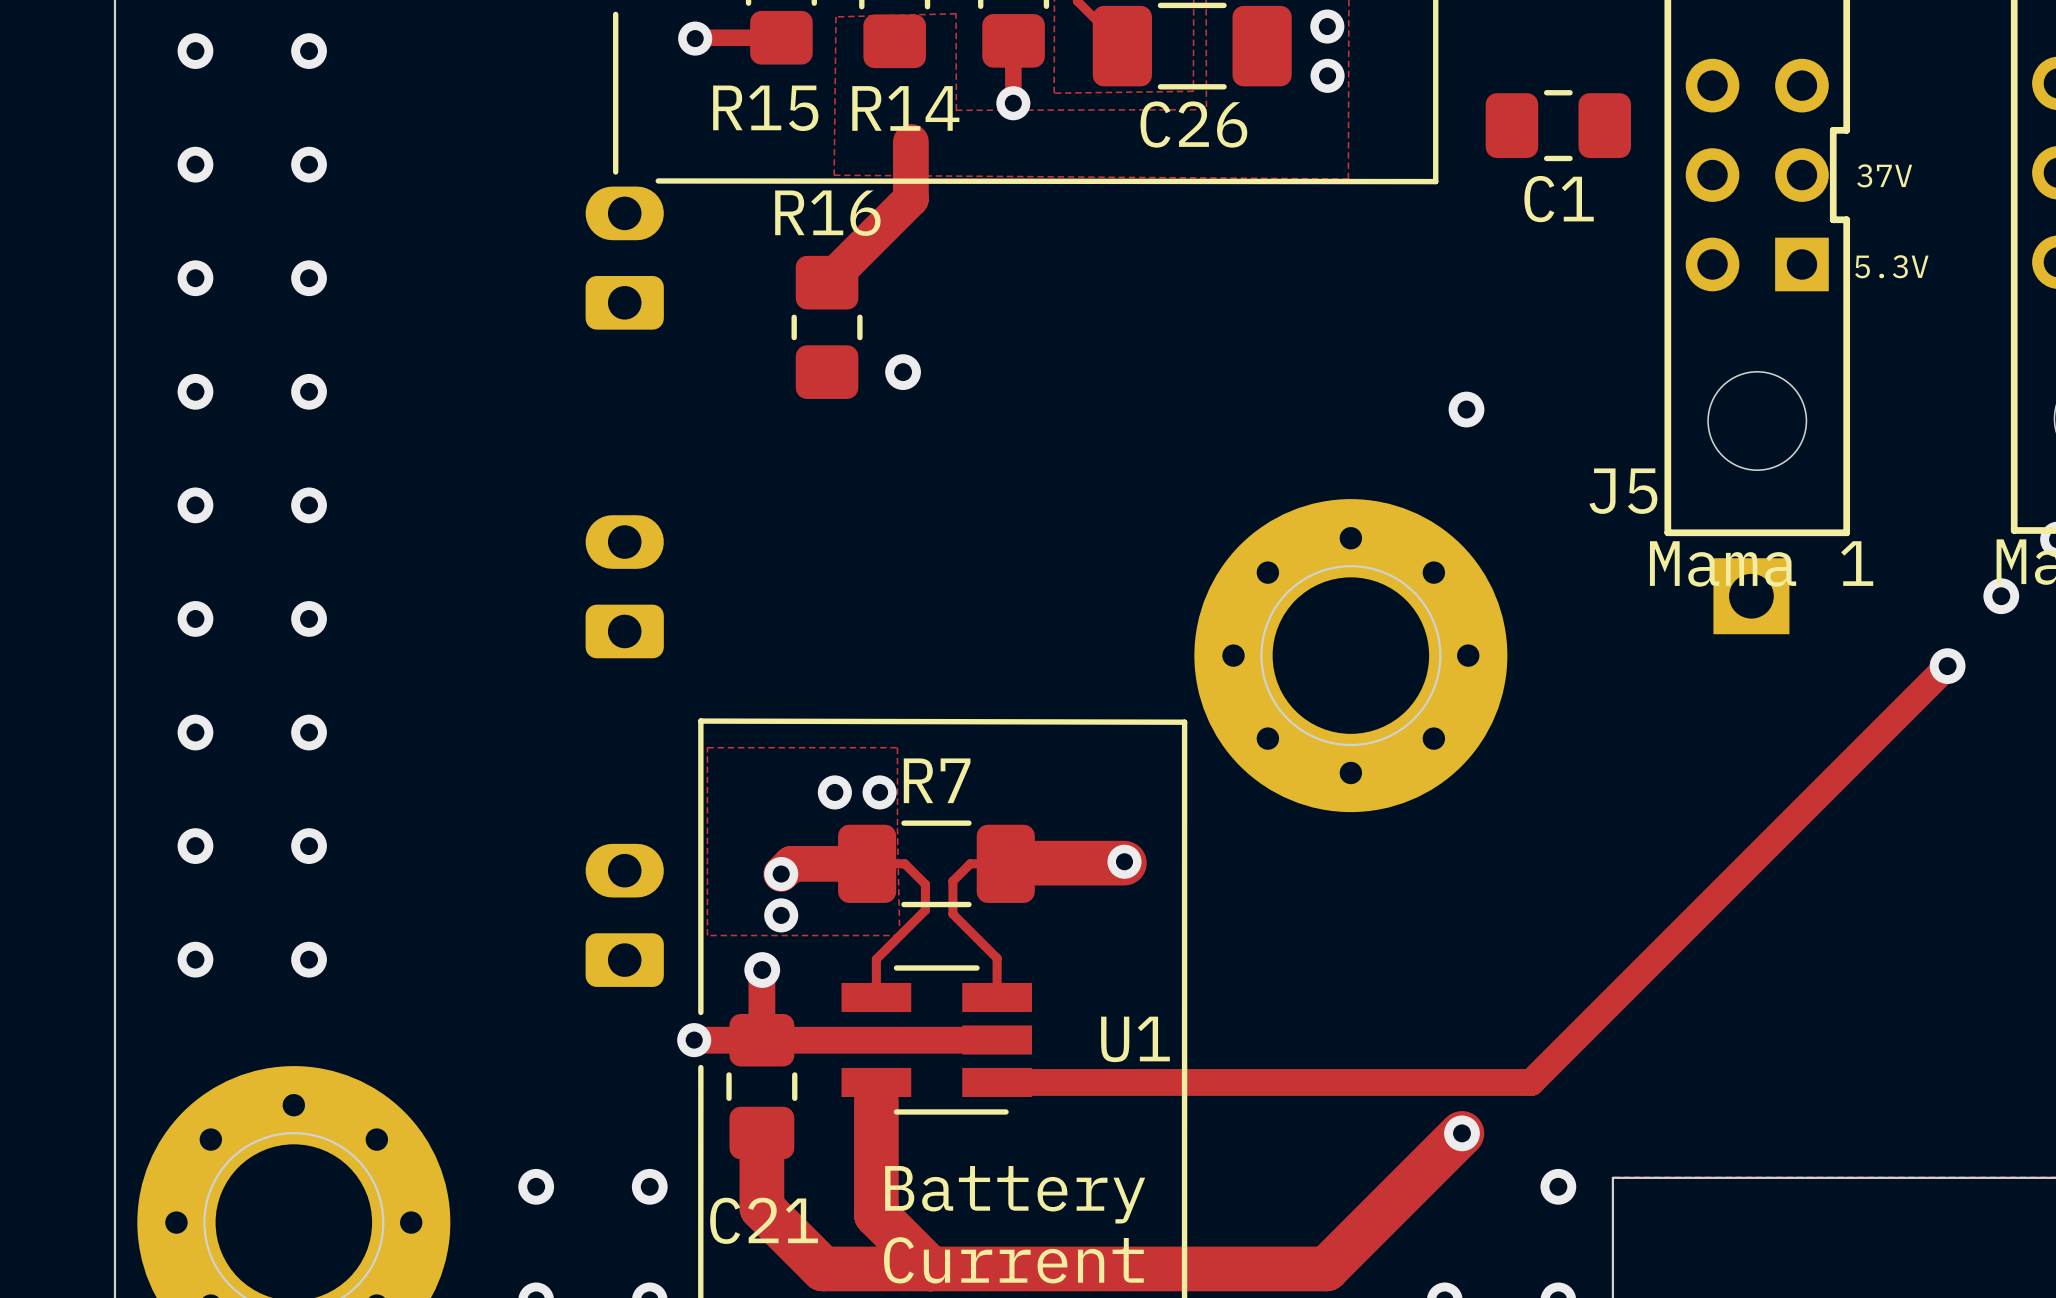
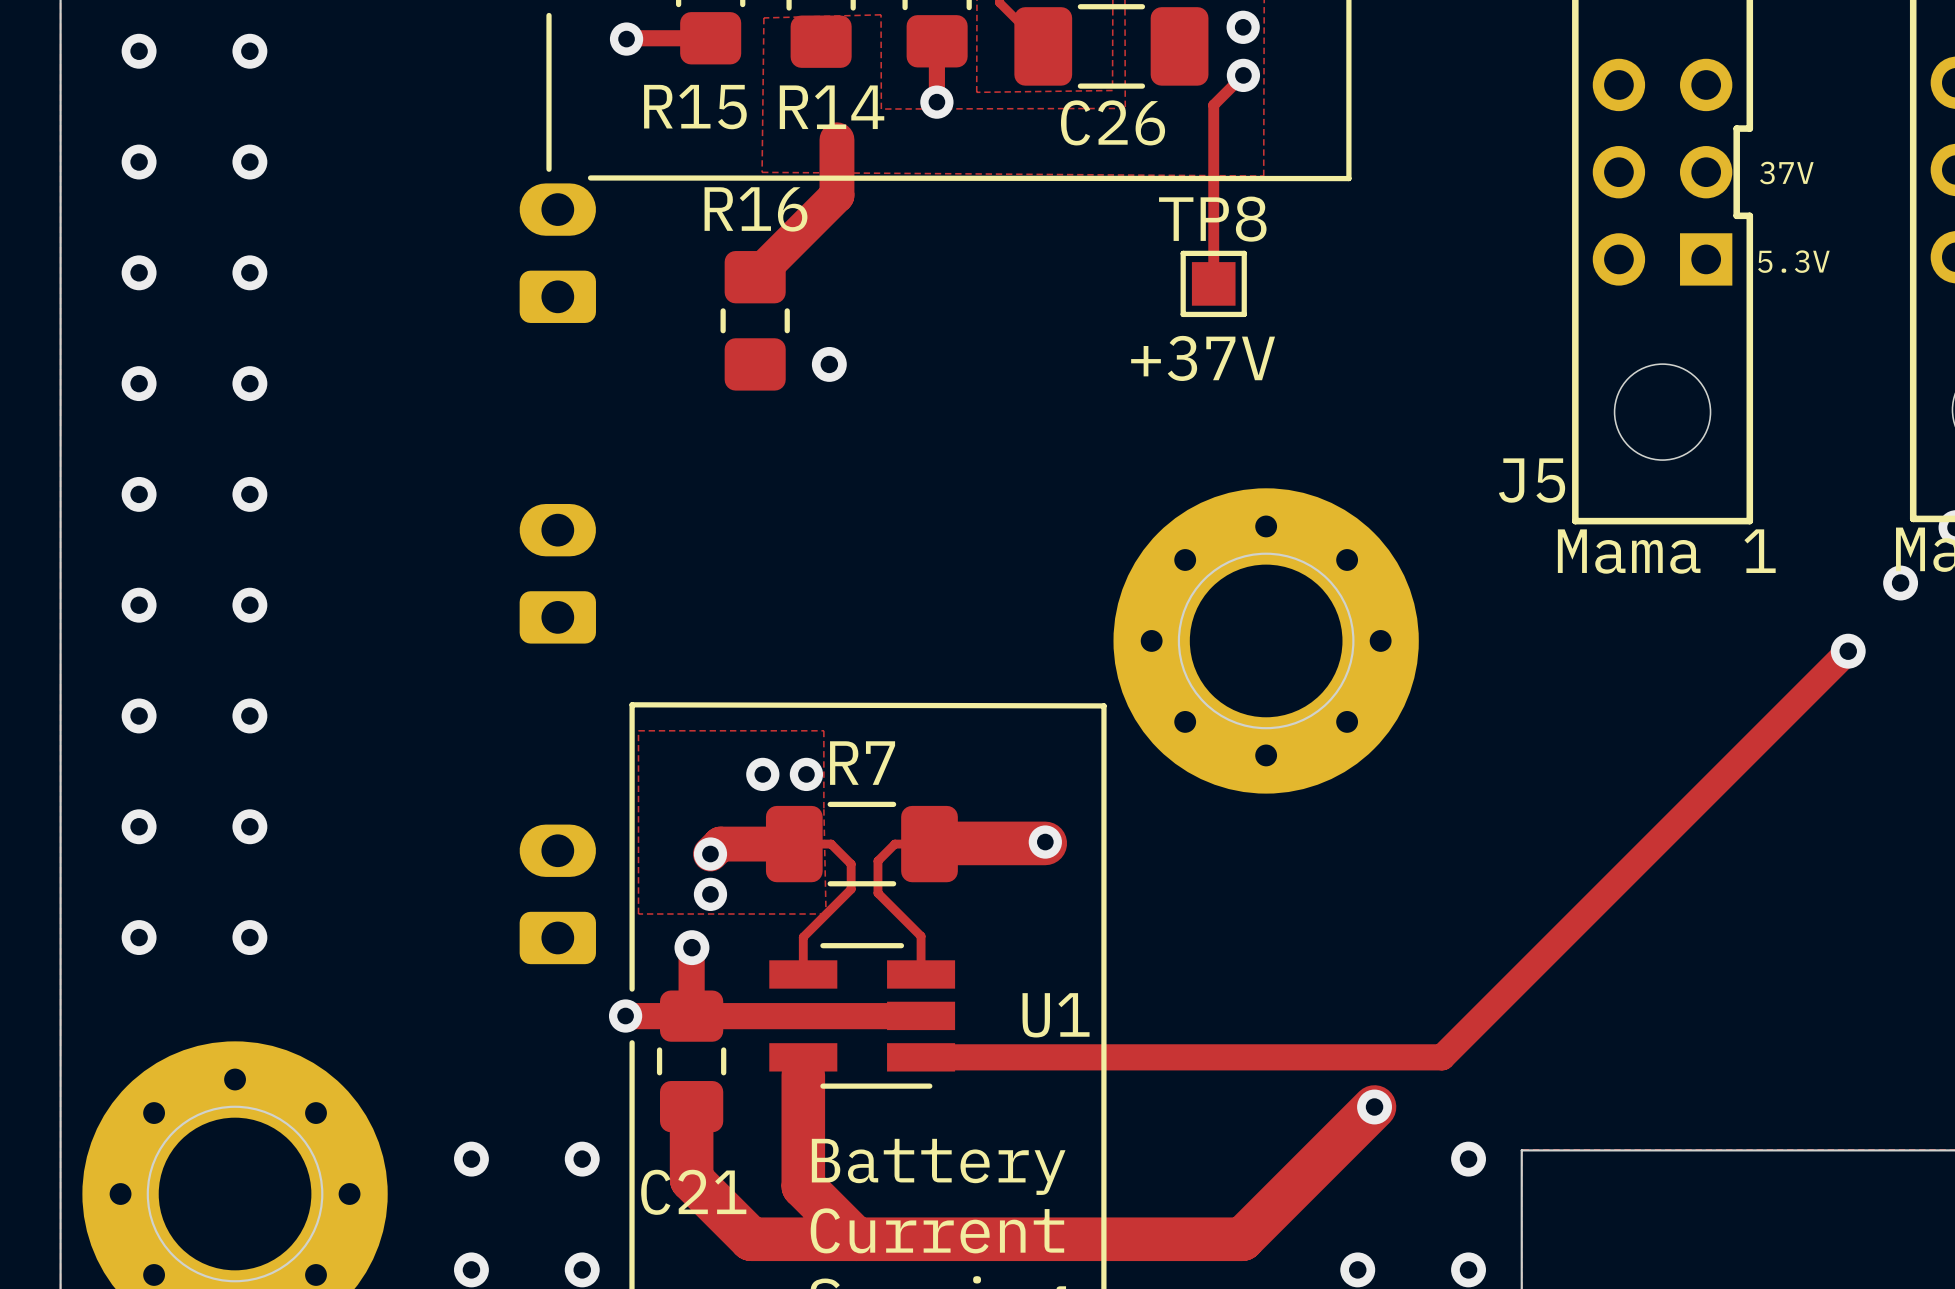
track: none -> (1243, 75) (1213, 105) (1213, 283)
C1: (1558, 125) -> none
TP8: none -> (1213, 283)
text: none -> +37V (1203, 358)
via: (1466, 409) -> none
part: (1751, 596) -> none

